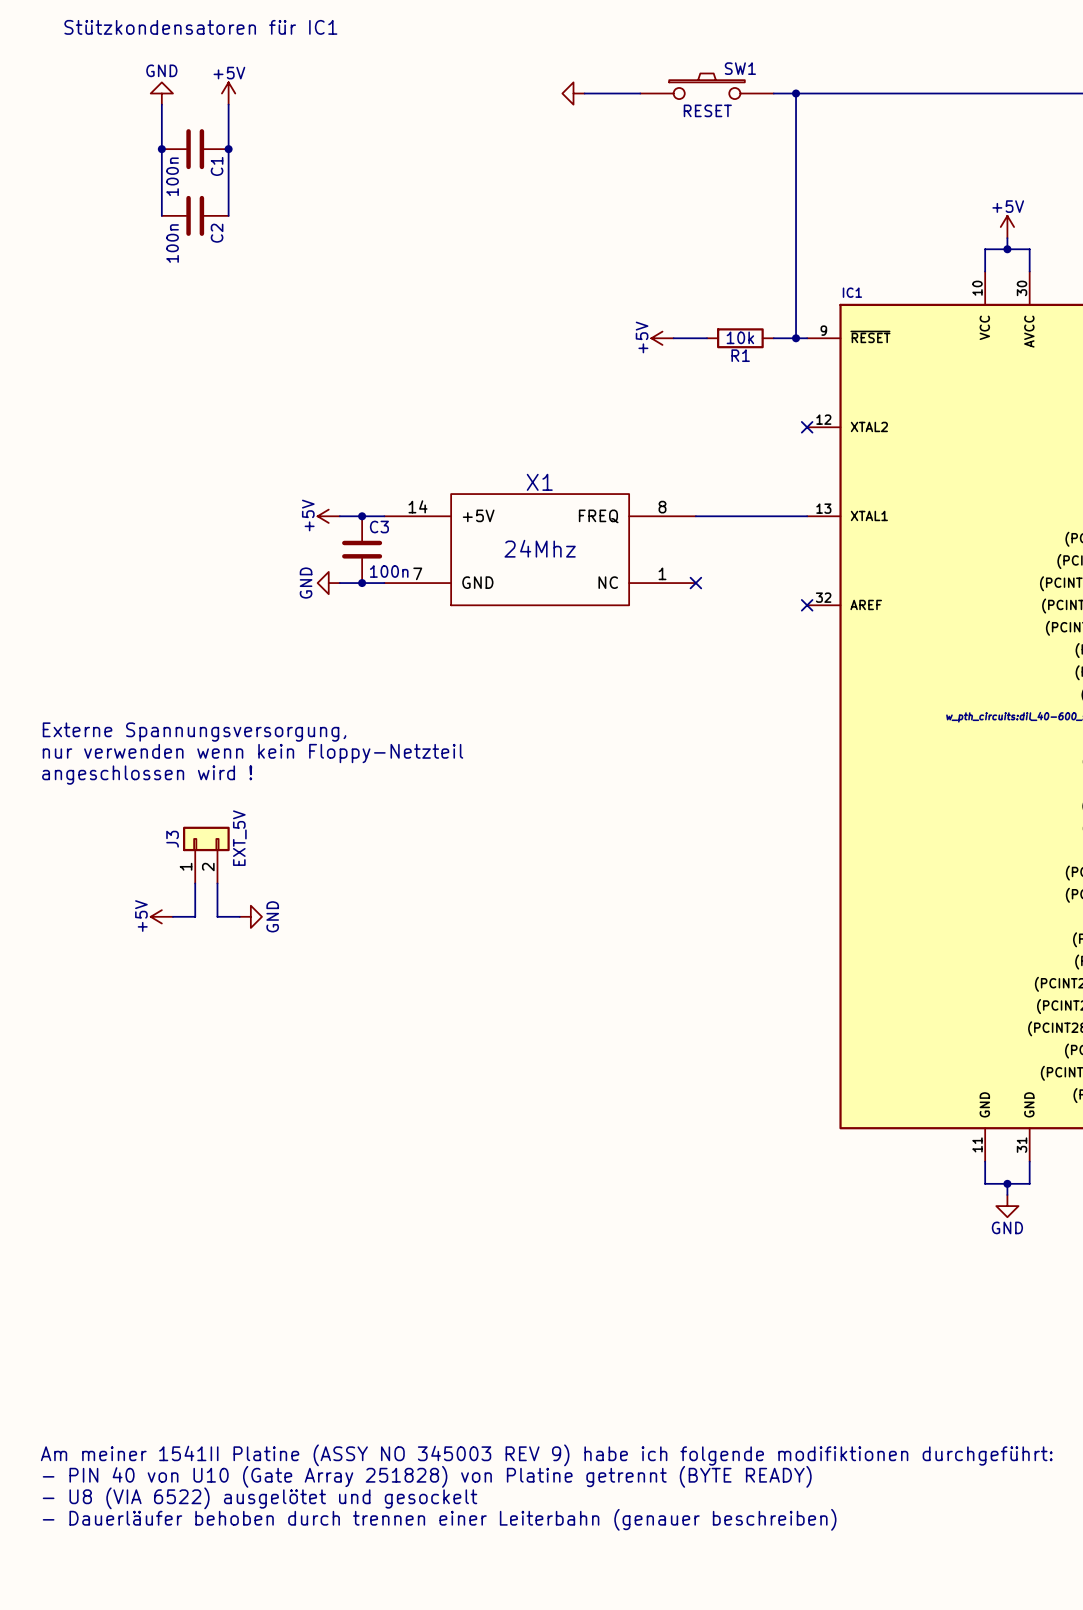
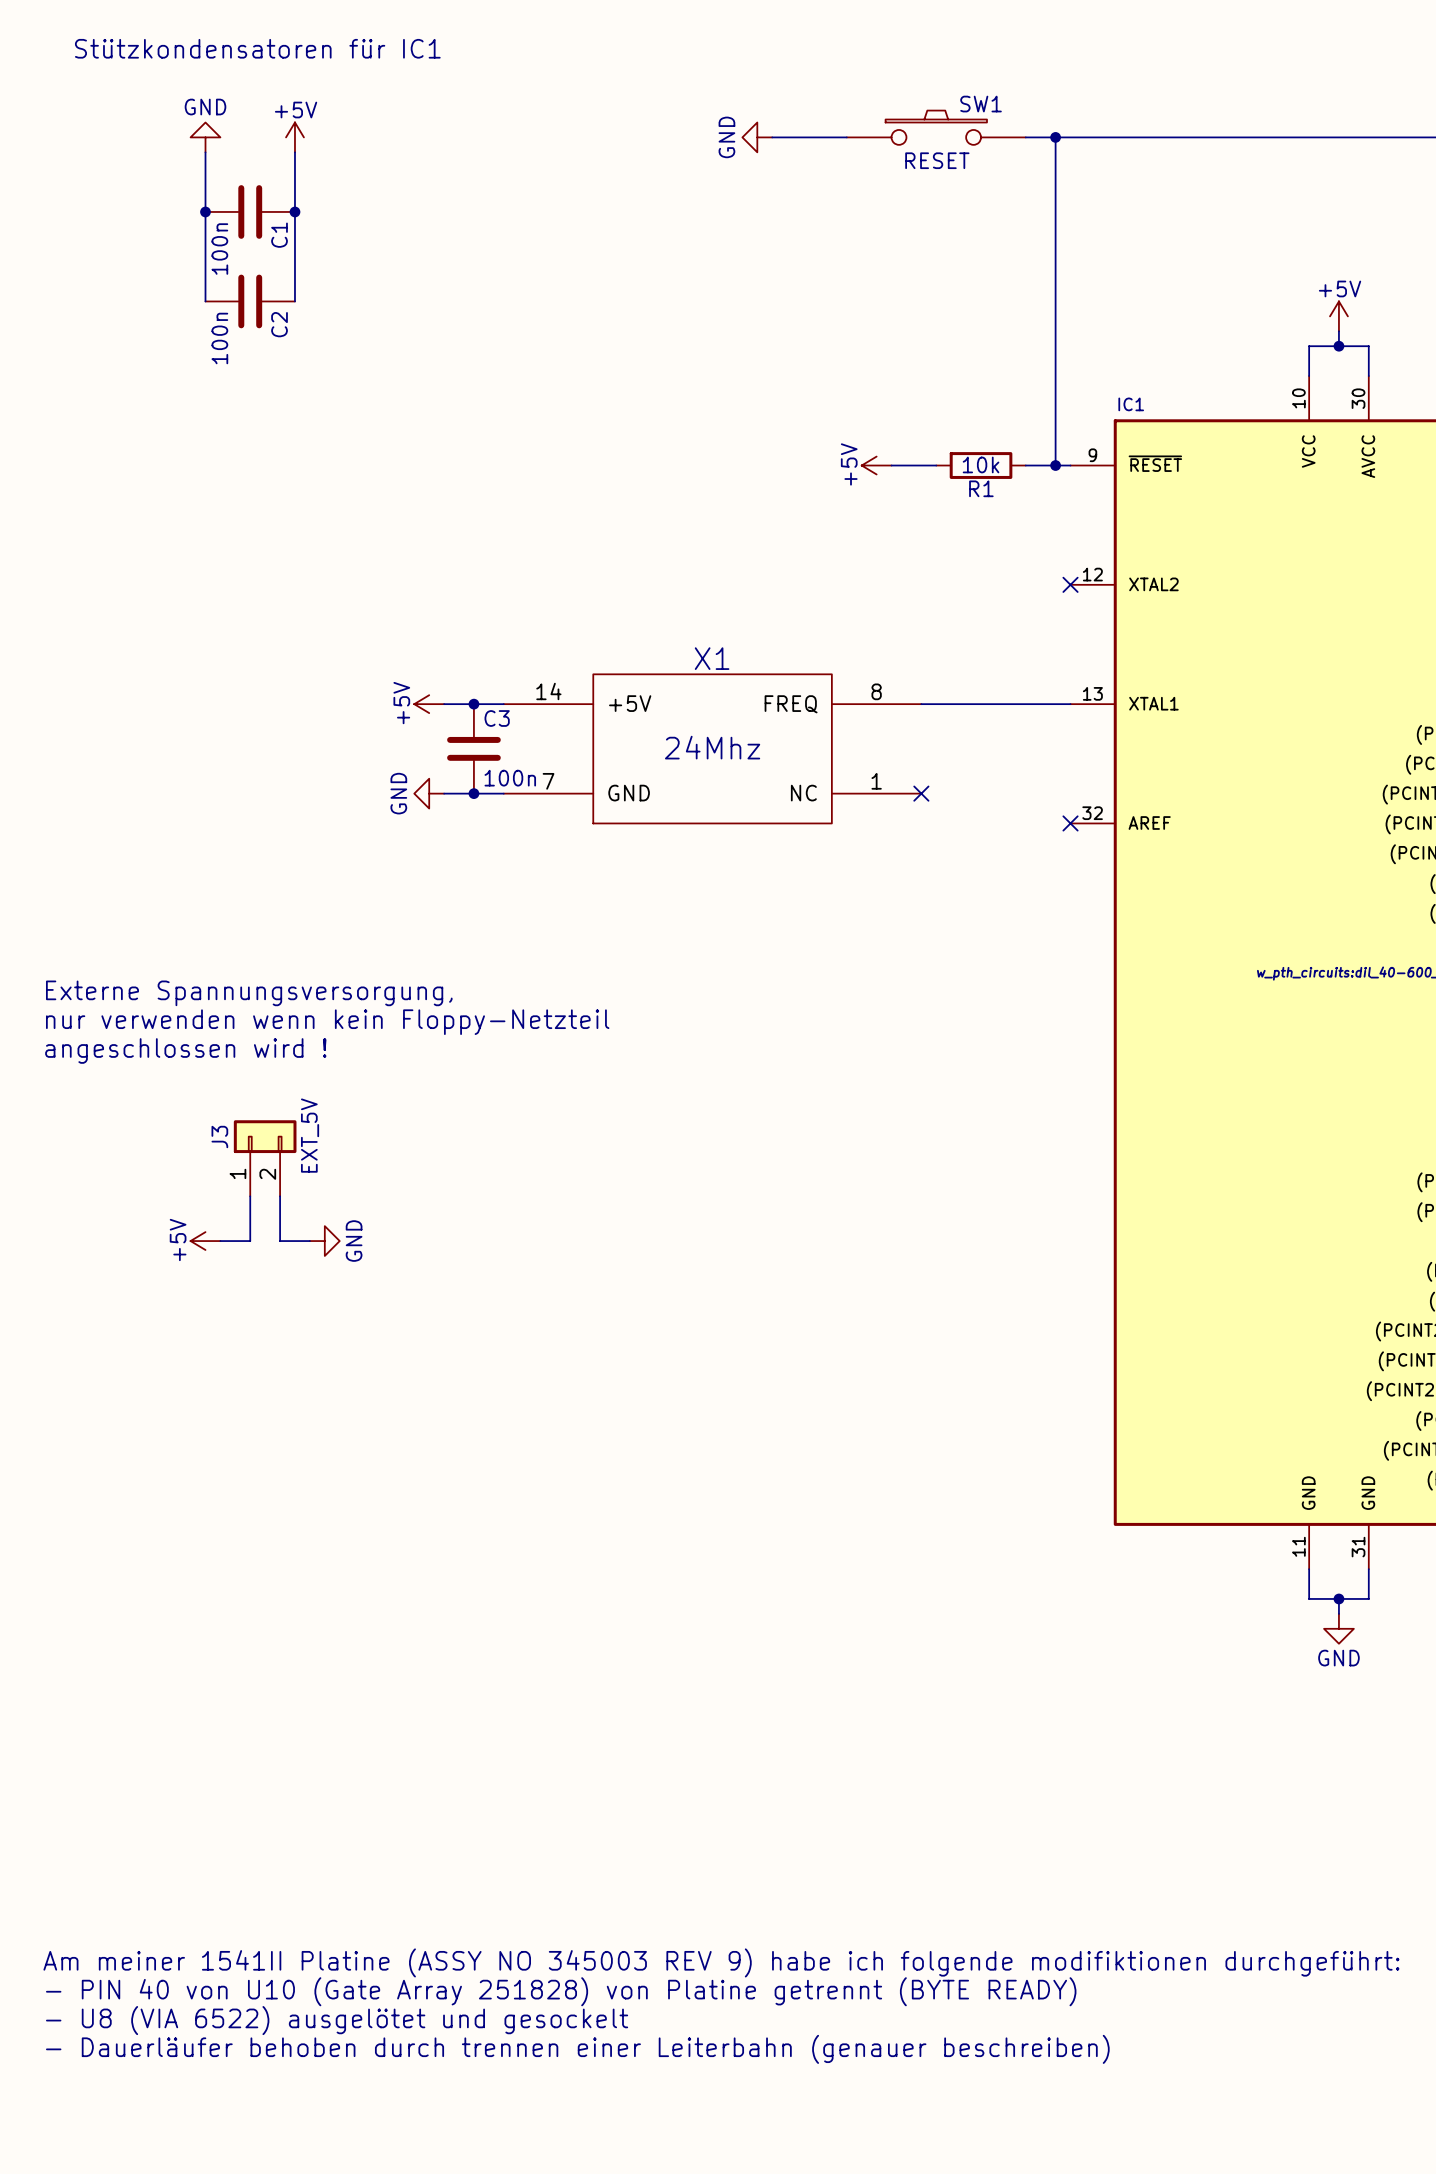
power symbol text: none -> GND (726, 137)

